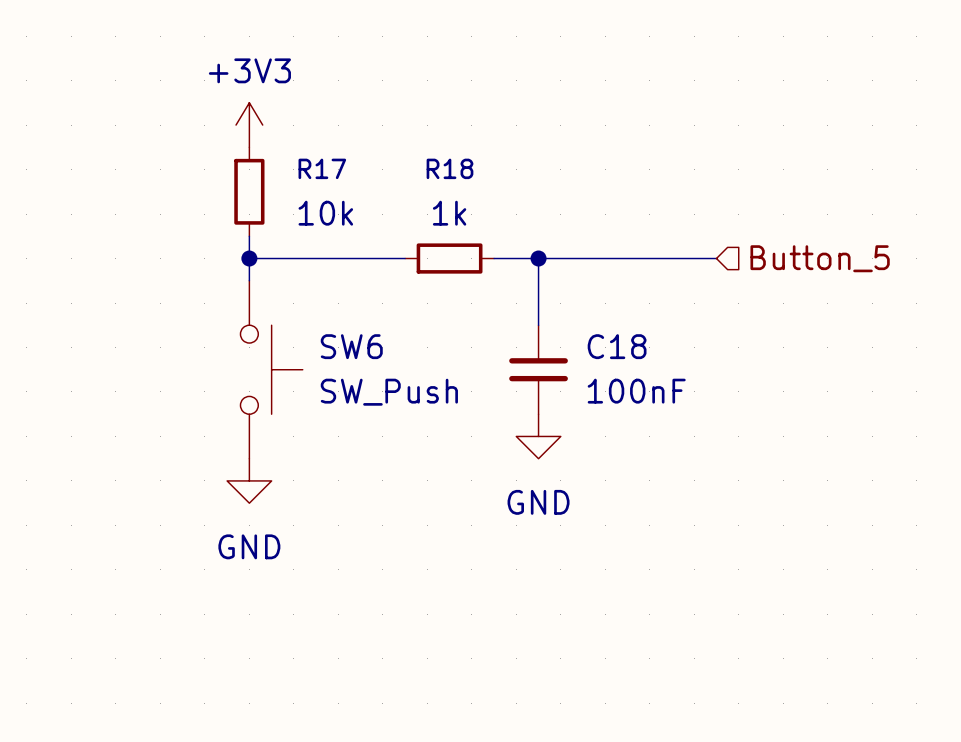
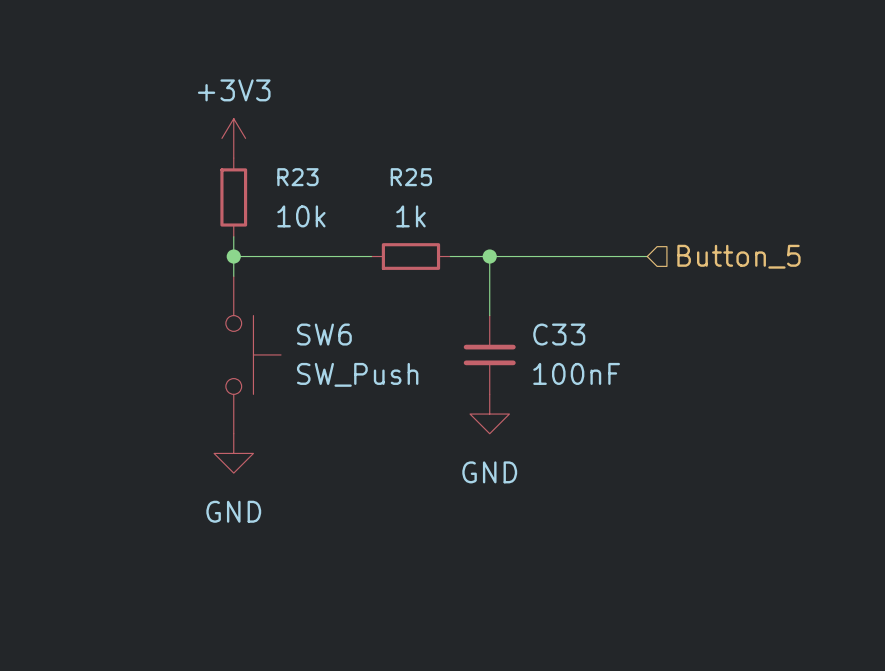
R17 name: R17 (322, 168) -> R23 (297, 177)
R18 name: R18 (449, 168) -> R25 (411, 177)
C18 name: C18 (617, 346) -> C33 (559, 334)

